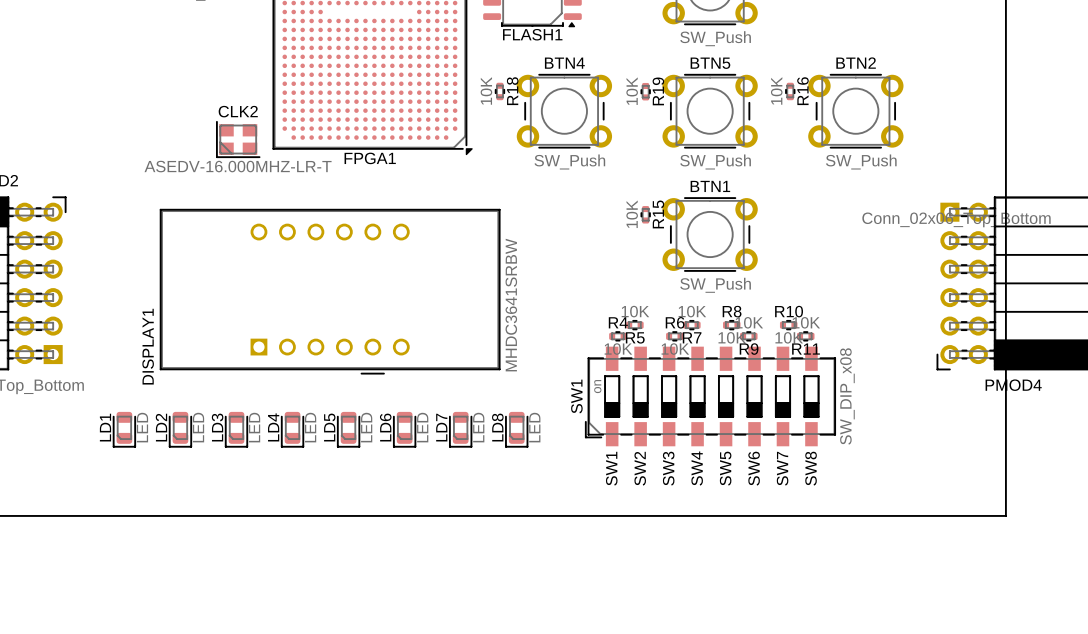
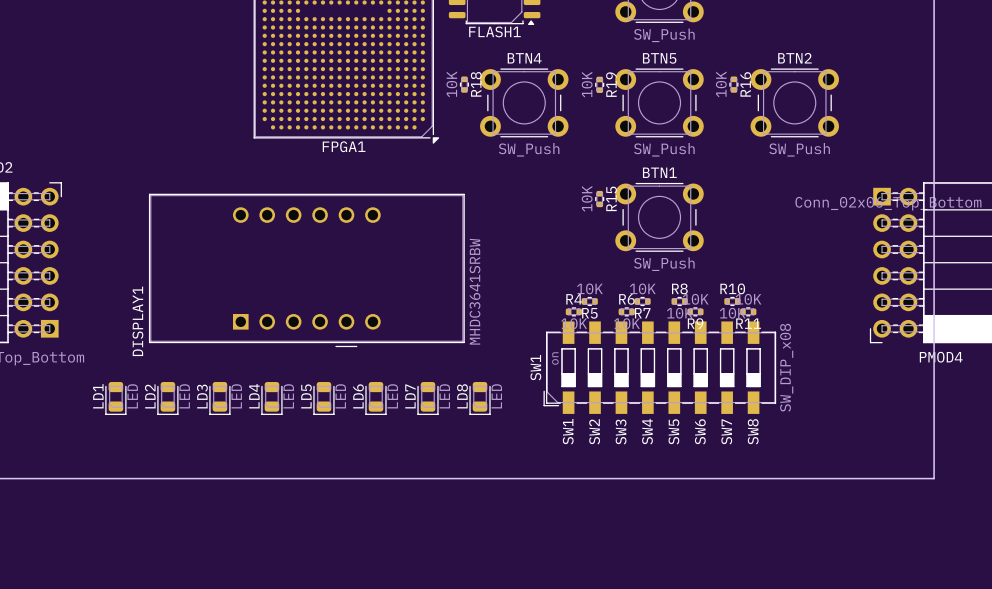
CLK2: ASEDV-16.000MHZ-LR-T (238, 139) -> none

